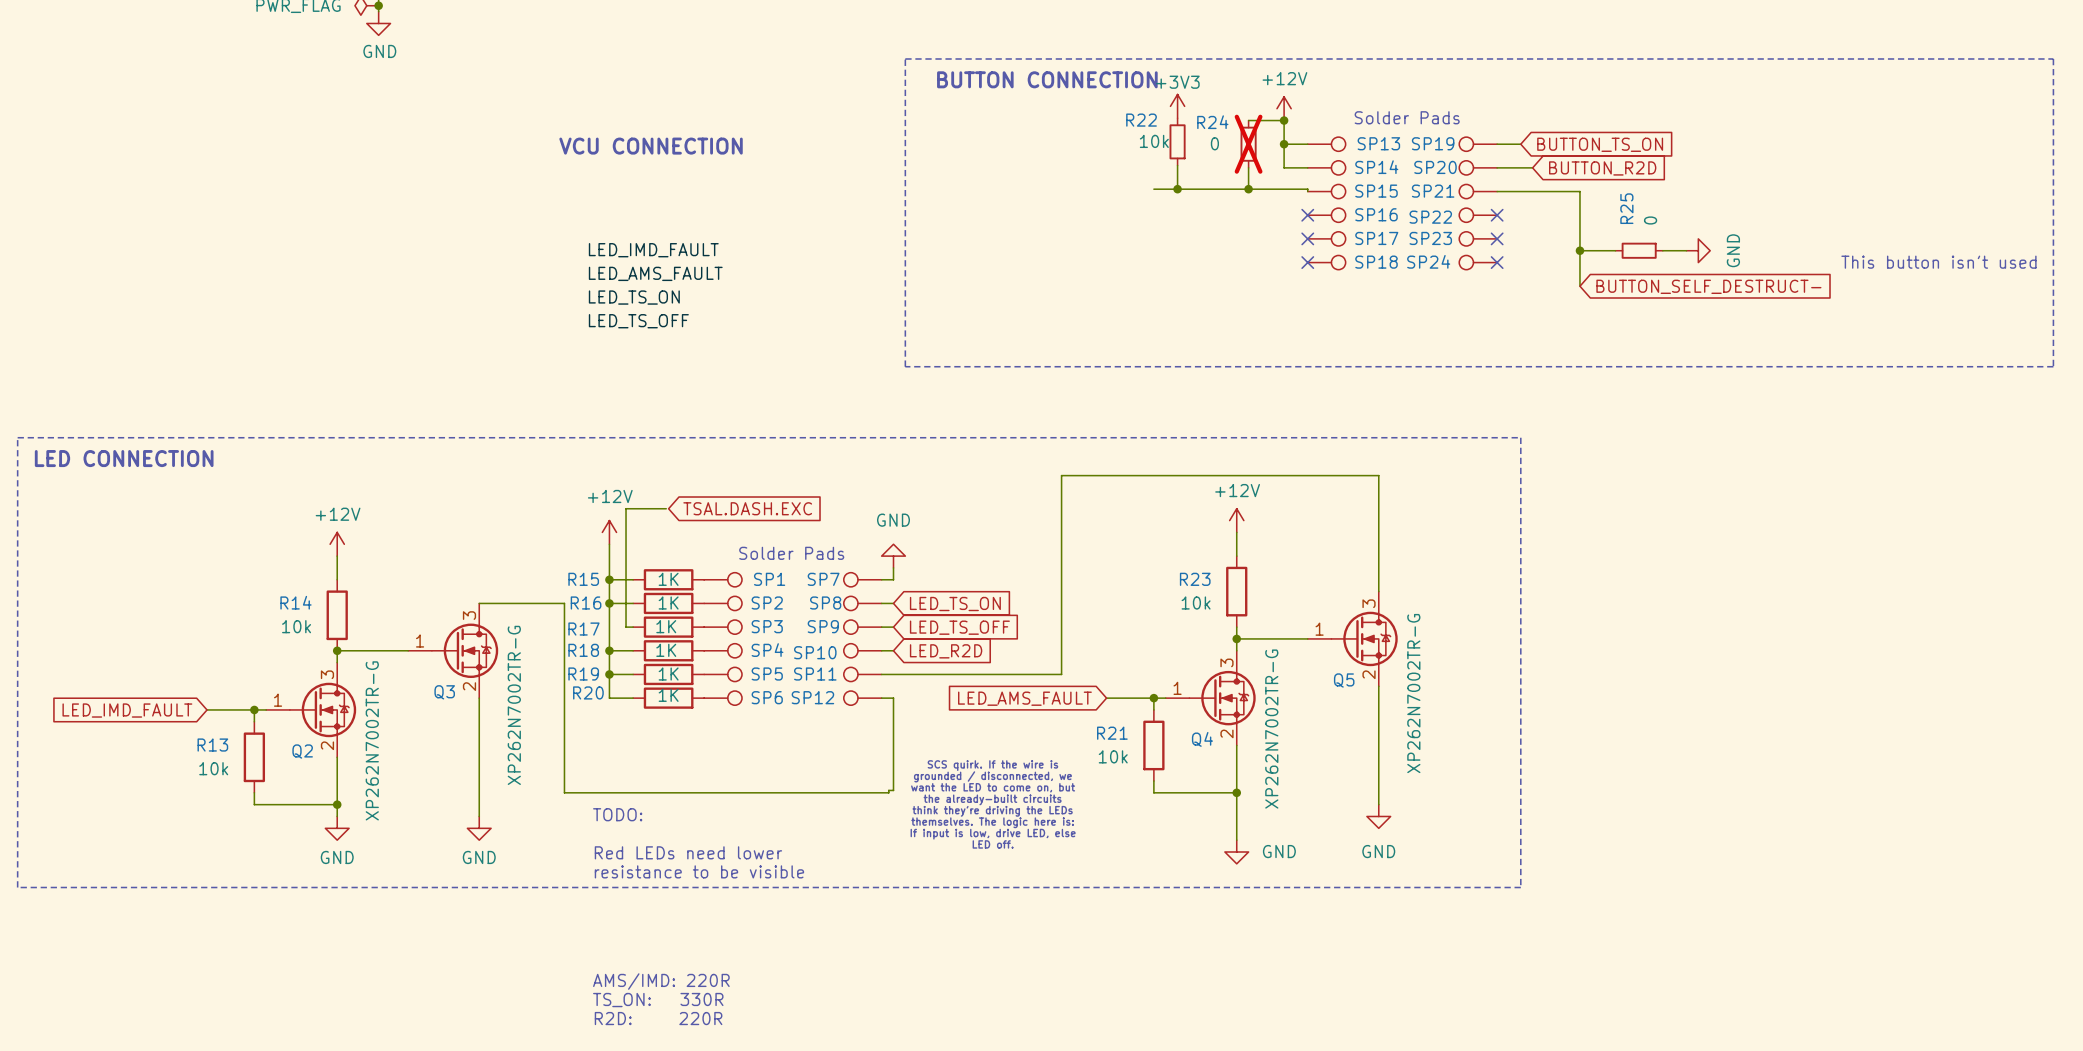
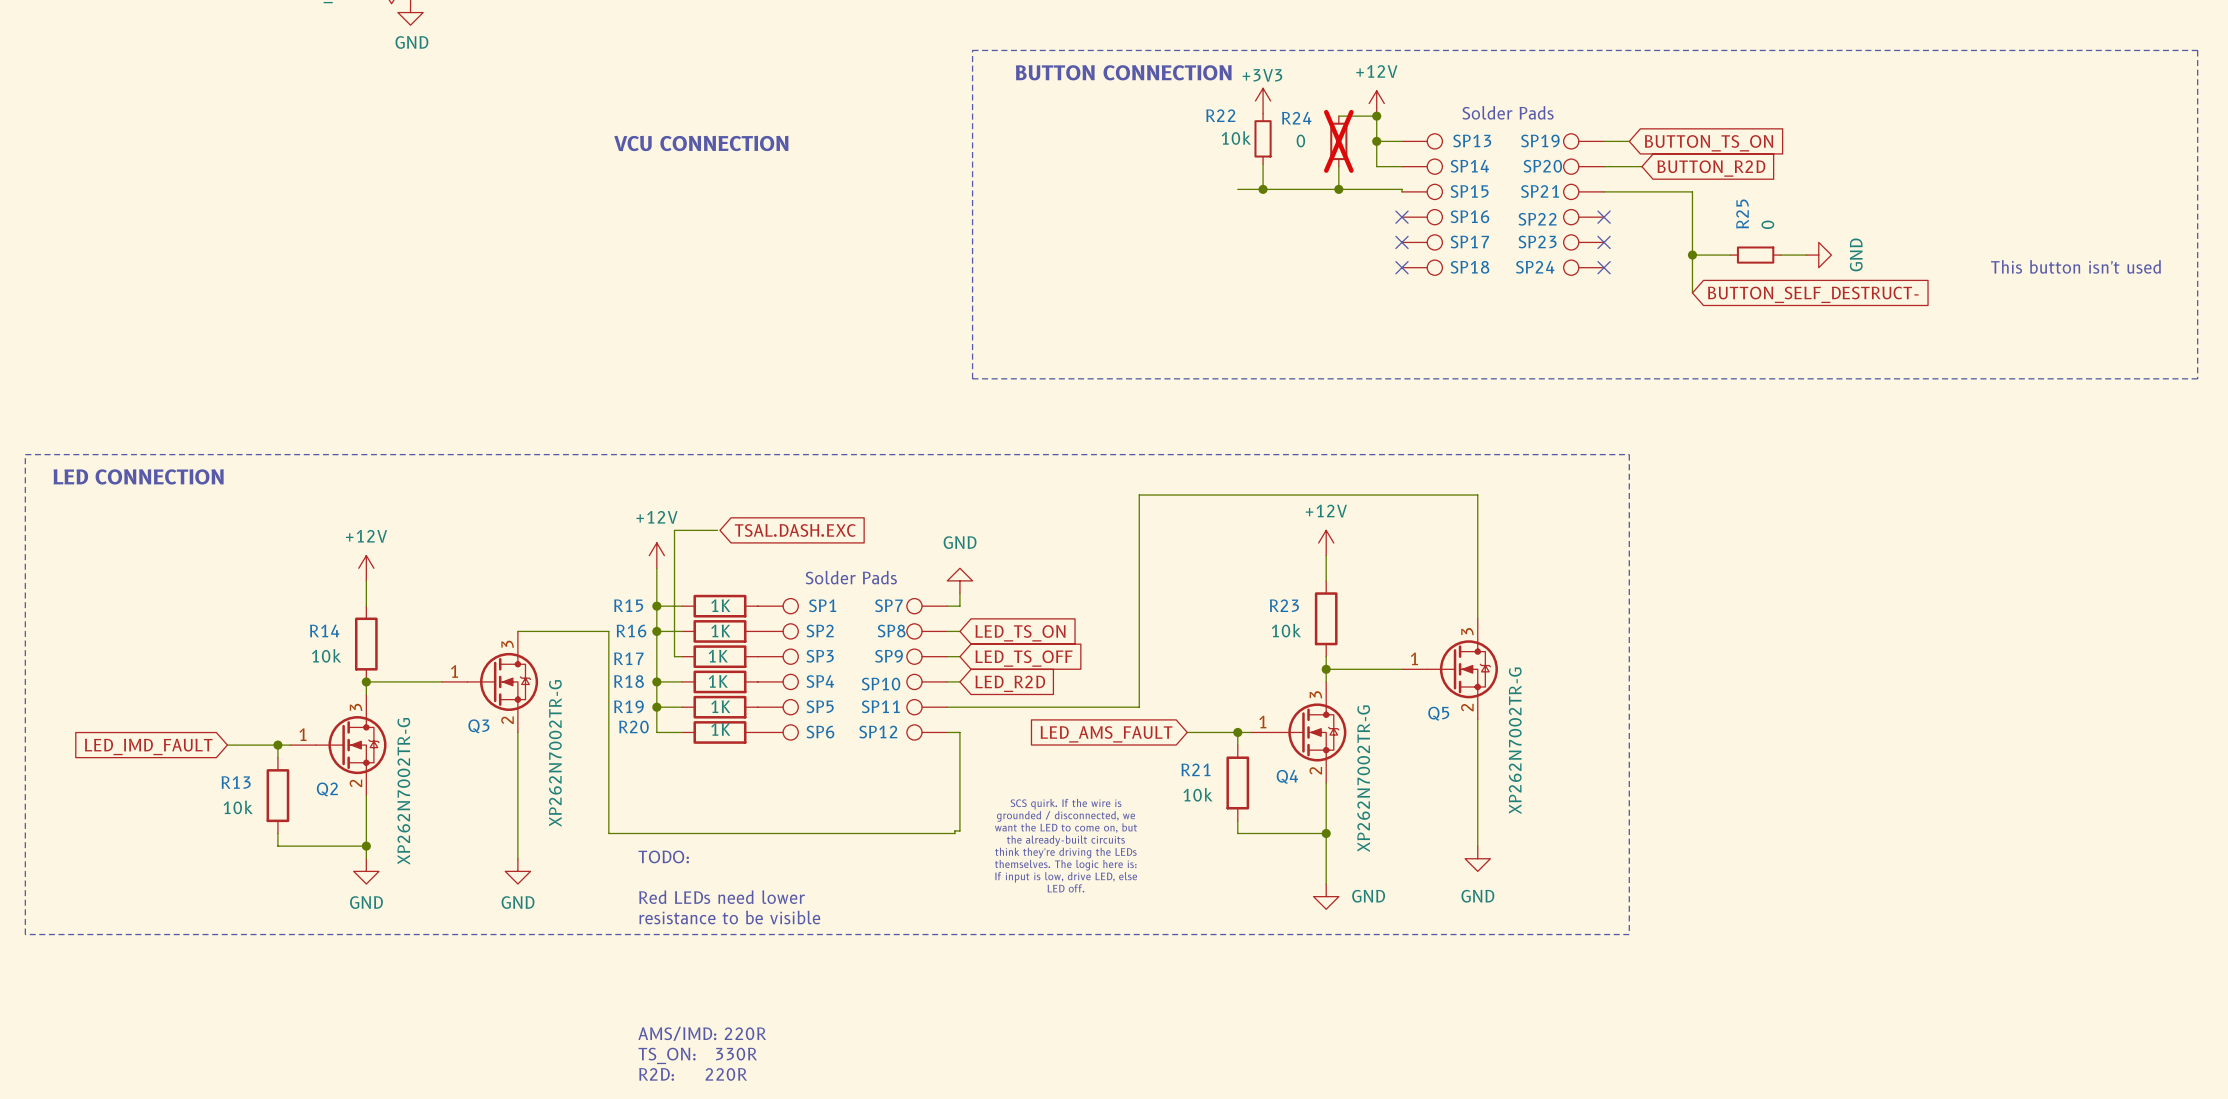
label: LED_IMD_FAULT (653, 250) -> none
label: LED_AMS_FAULT (655, 273) -> none
label: LED_TS_ON (634, 297) -> none
label: LED_TS_OFF (638, 321) -> none

